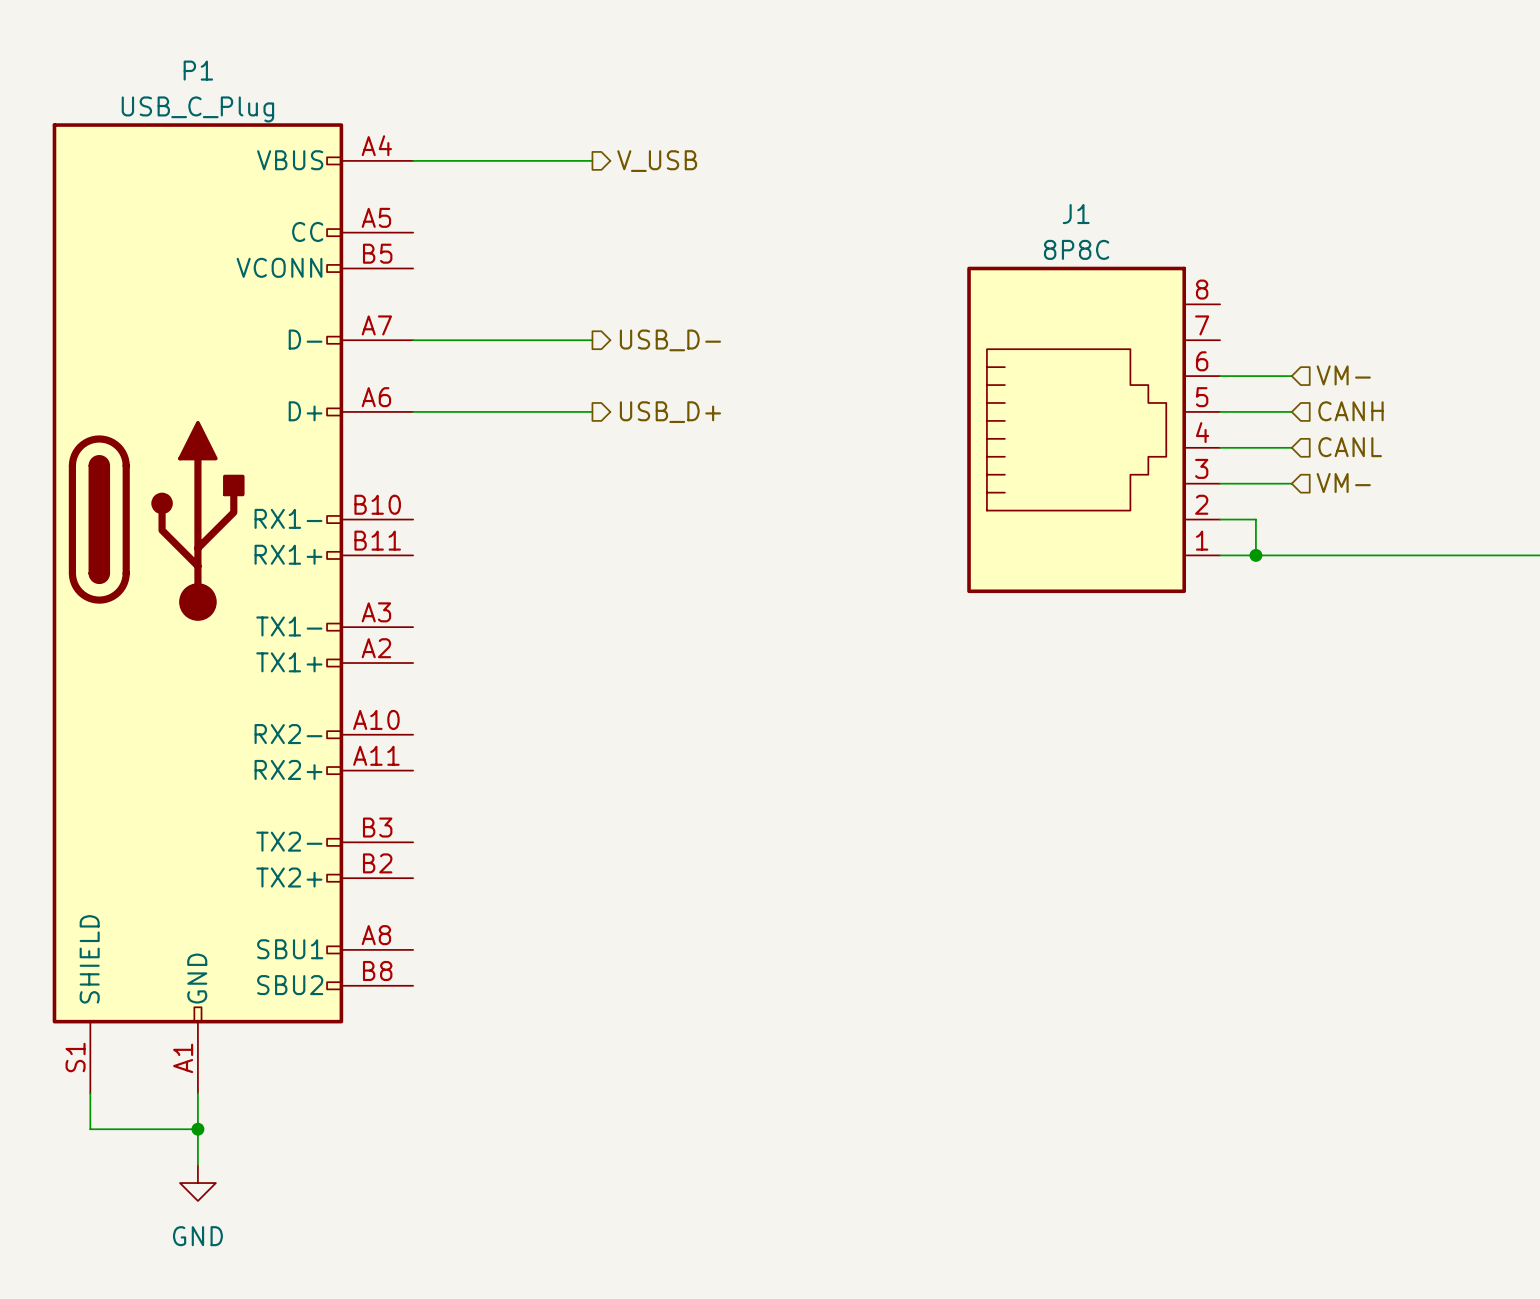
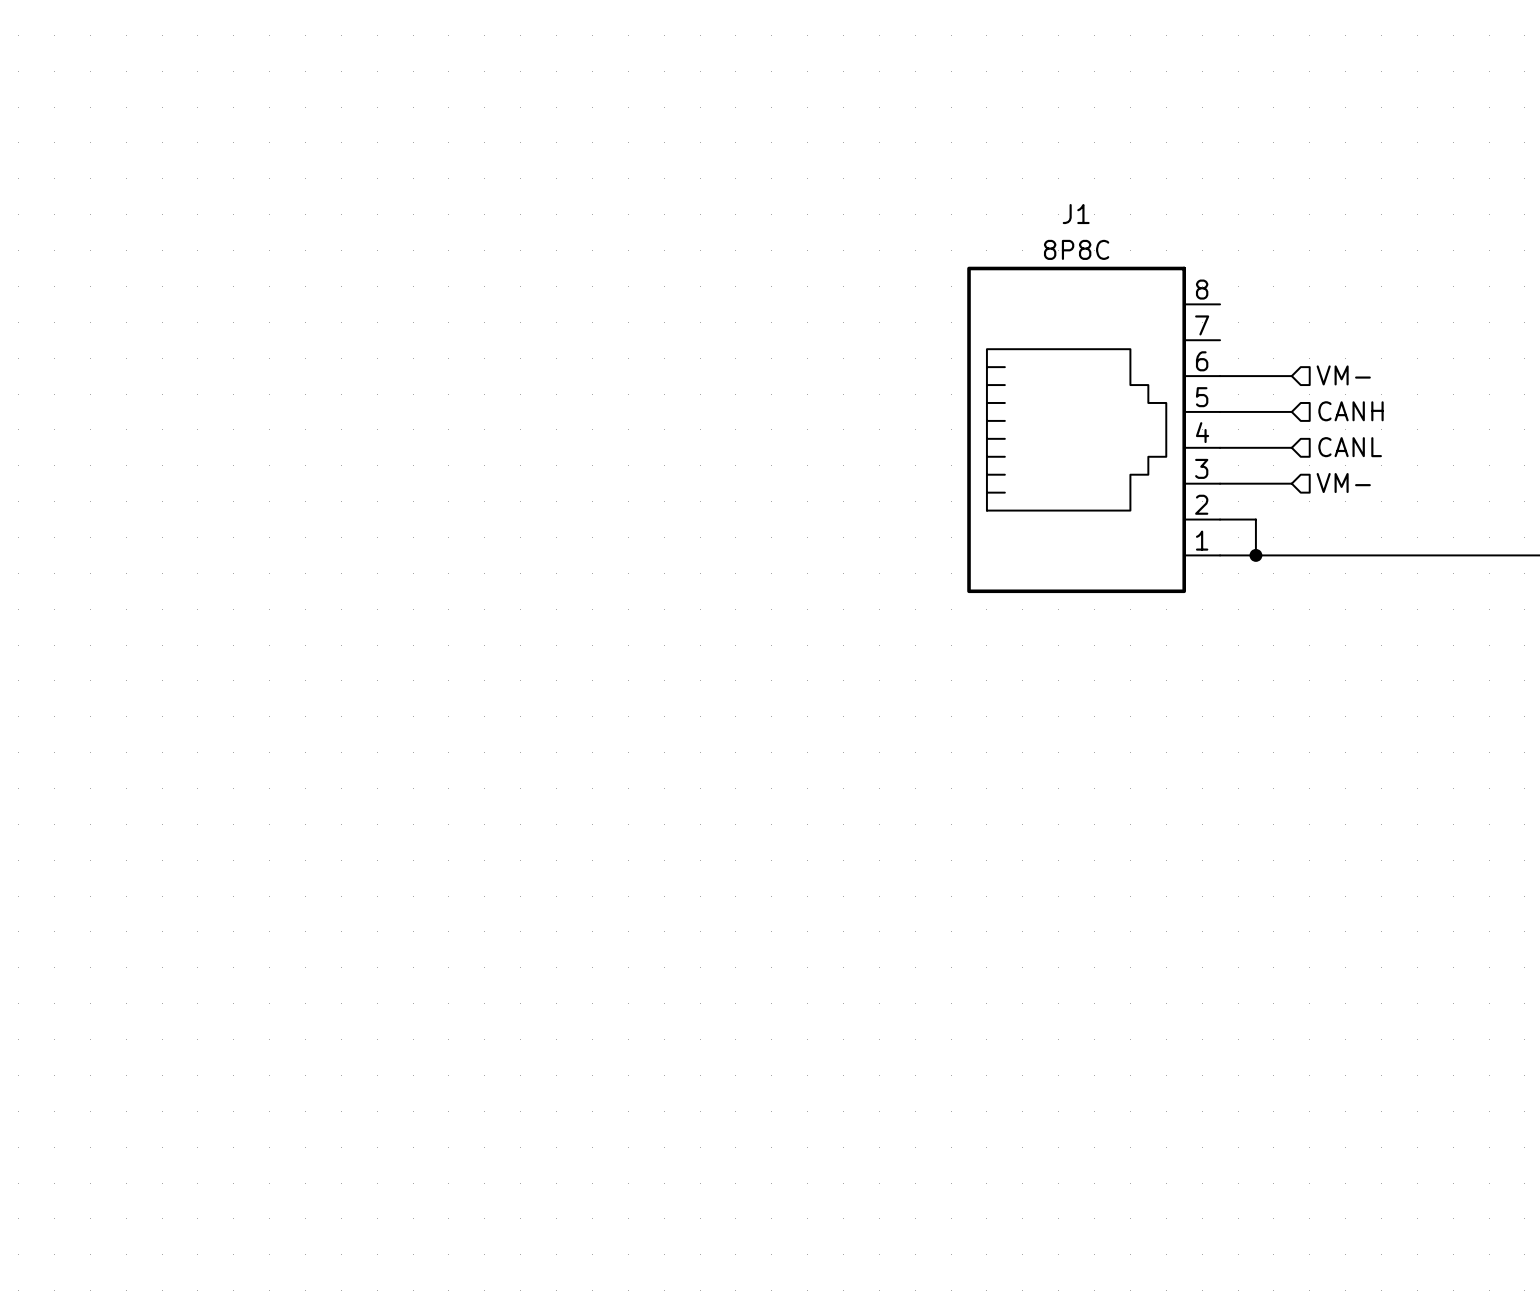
wire: (413, 160) (592, 160) -> none
hierarchical label: V_USB (657, 161) -> none
wire: (413, 340) (592, 340) -> none
hierarchical label: USB_D- (670, 340) -> none
wire: (413, 411) (592, 411) -> none
hierarchical label: USB_D+ (670, 412) -> none
P1: USB_C_Plug (232, 608) -> none
wire: (90, 1093) (90, 1129) (197, 1129) -> none
wire: (197, 1093) (197, 1165) -> none
junction: (197, 1129) -> none
power symbol: GND (197, 1183) -> none

